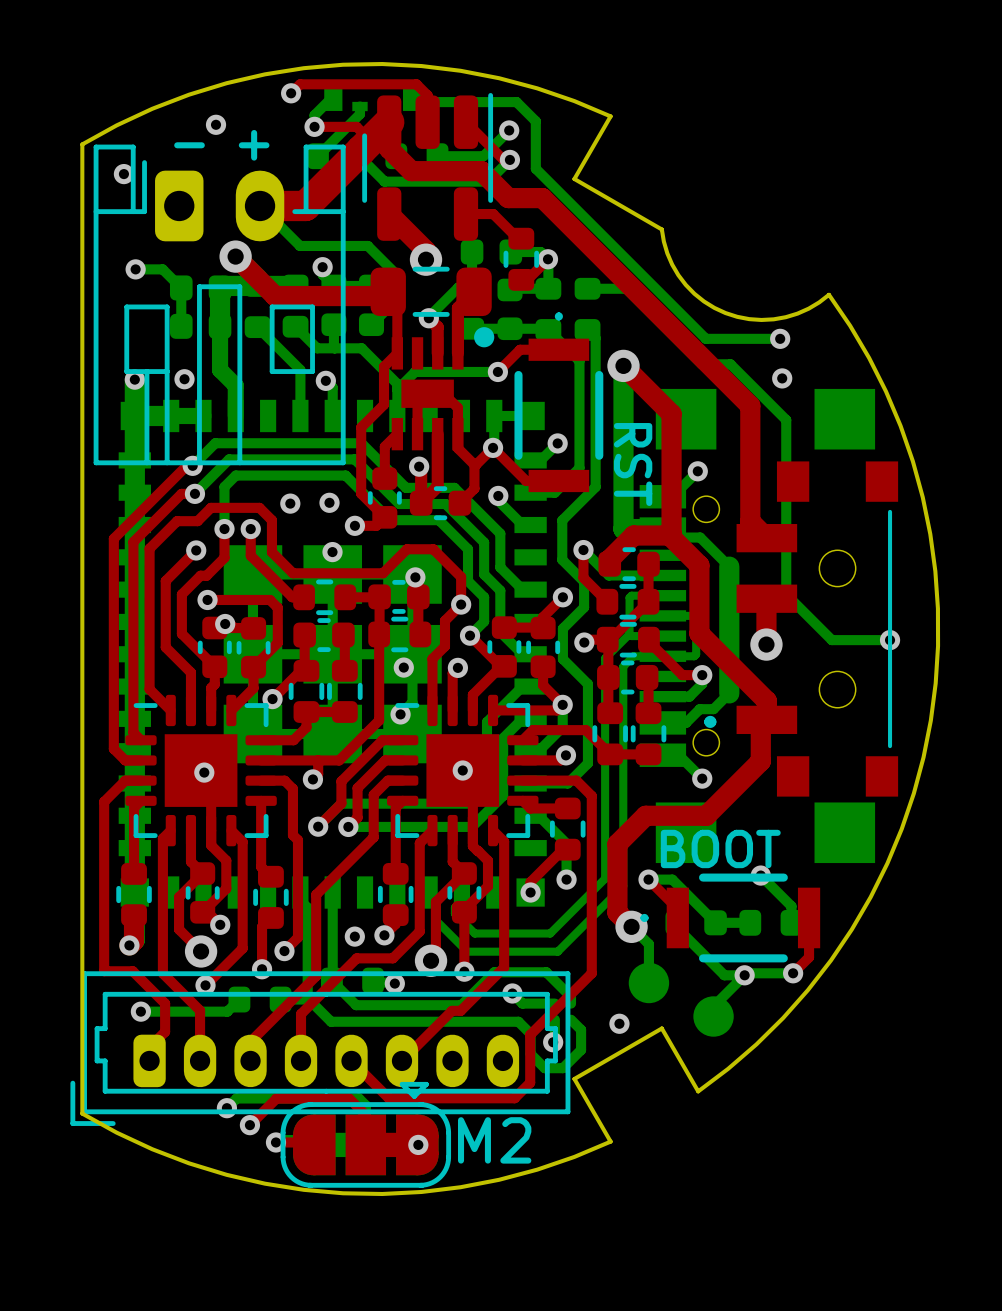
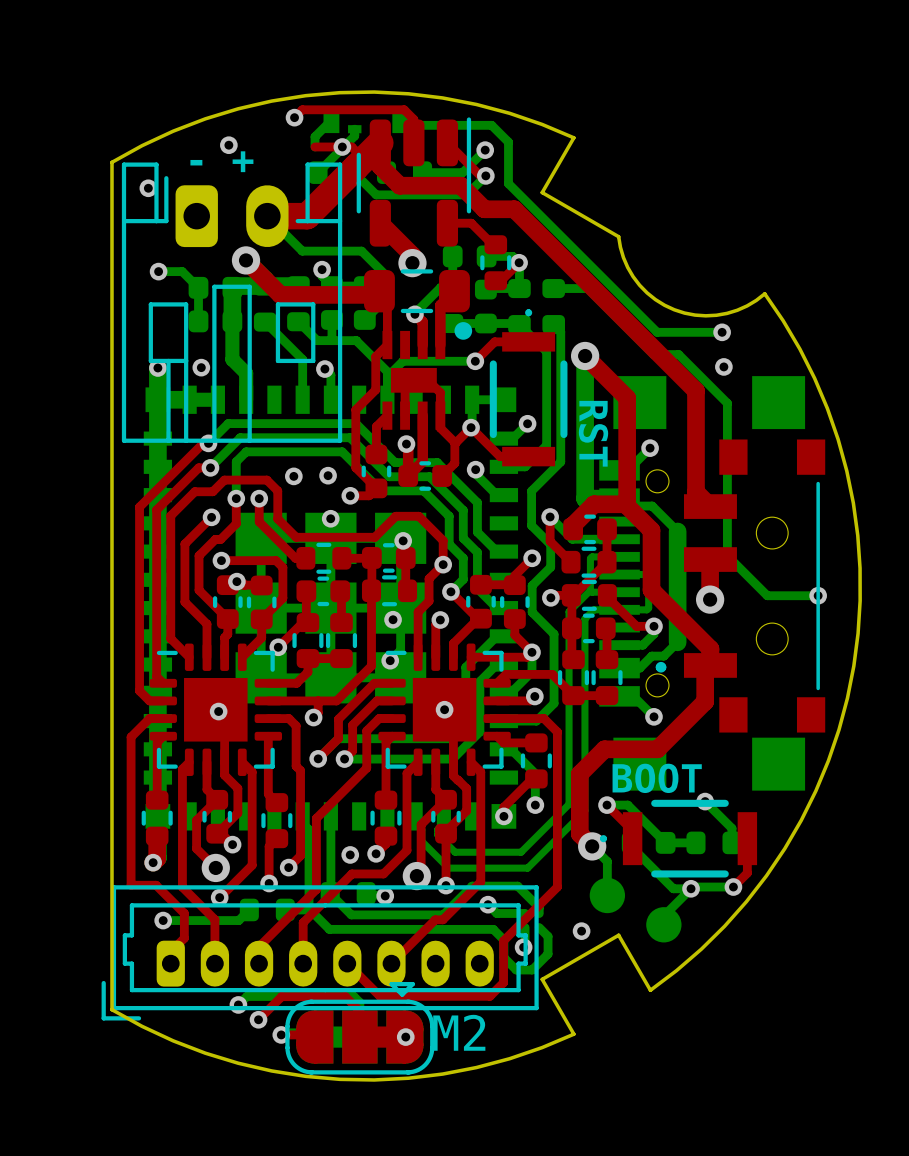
via position: (314, 126) -> (342, 146)

